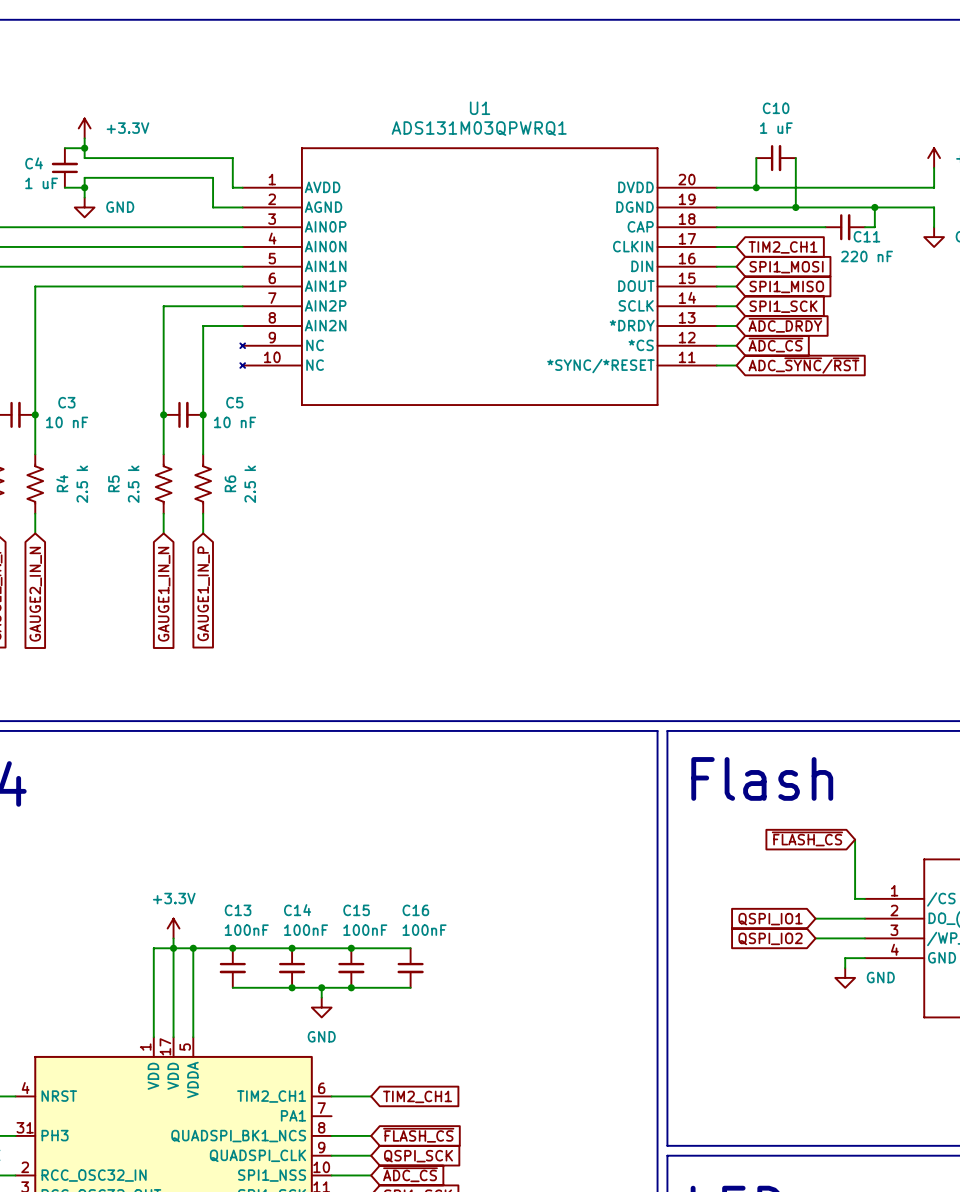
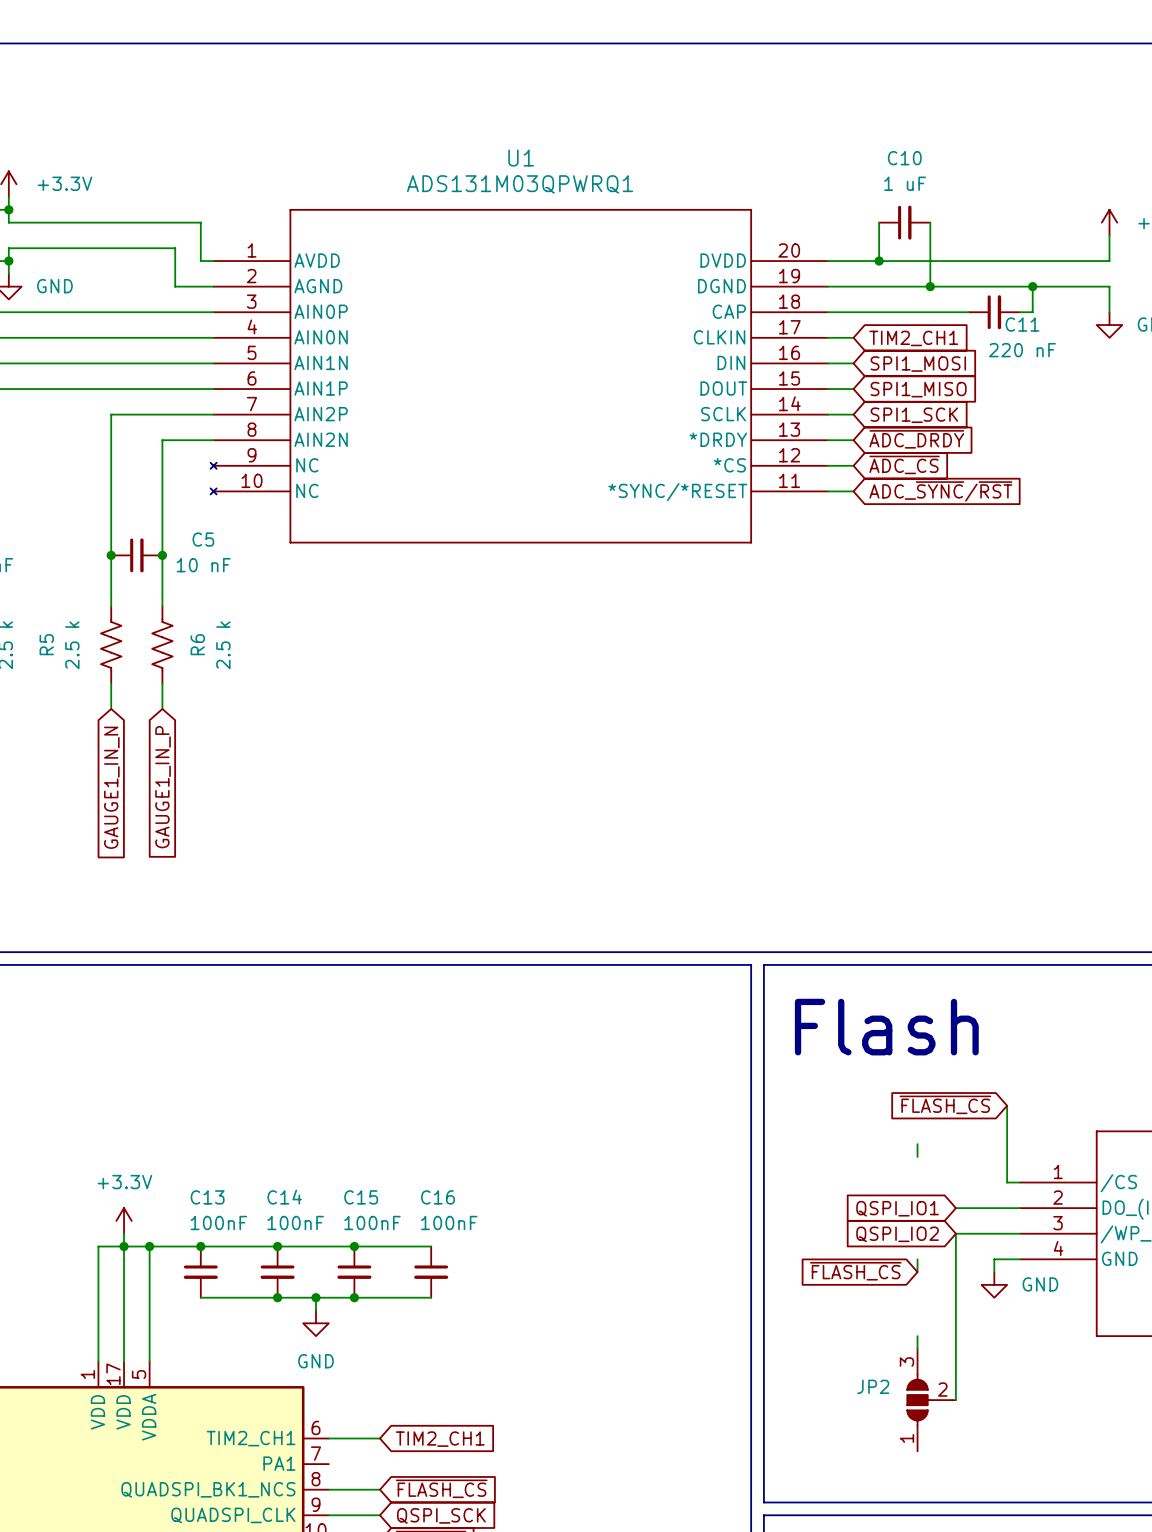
wire: none -> (917, 1144) (917, 1156)
wire: none -> (955, 1233) (955, 1400)
wire: none -> (917, 1259) (917, 1272)
global label: none -> ~{FLASH_CS} (855, 1271)
wire: none -> (917, 1336) (917, 1348)
JP2: none -> (931, 1400)

